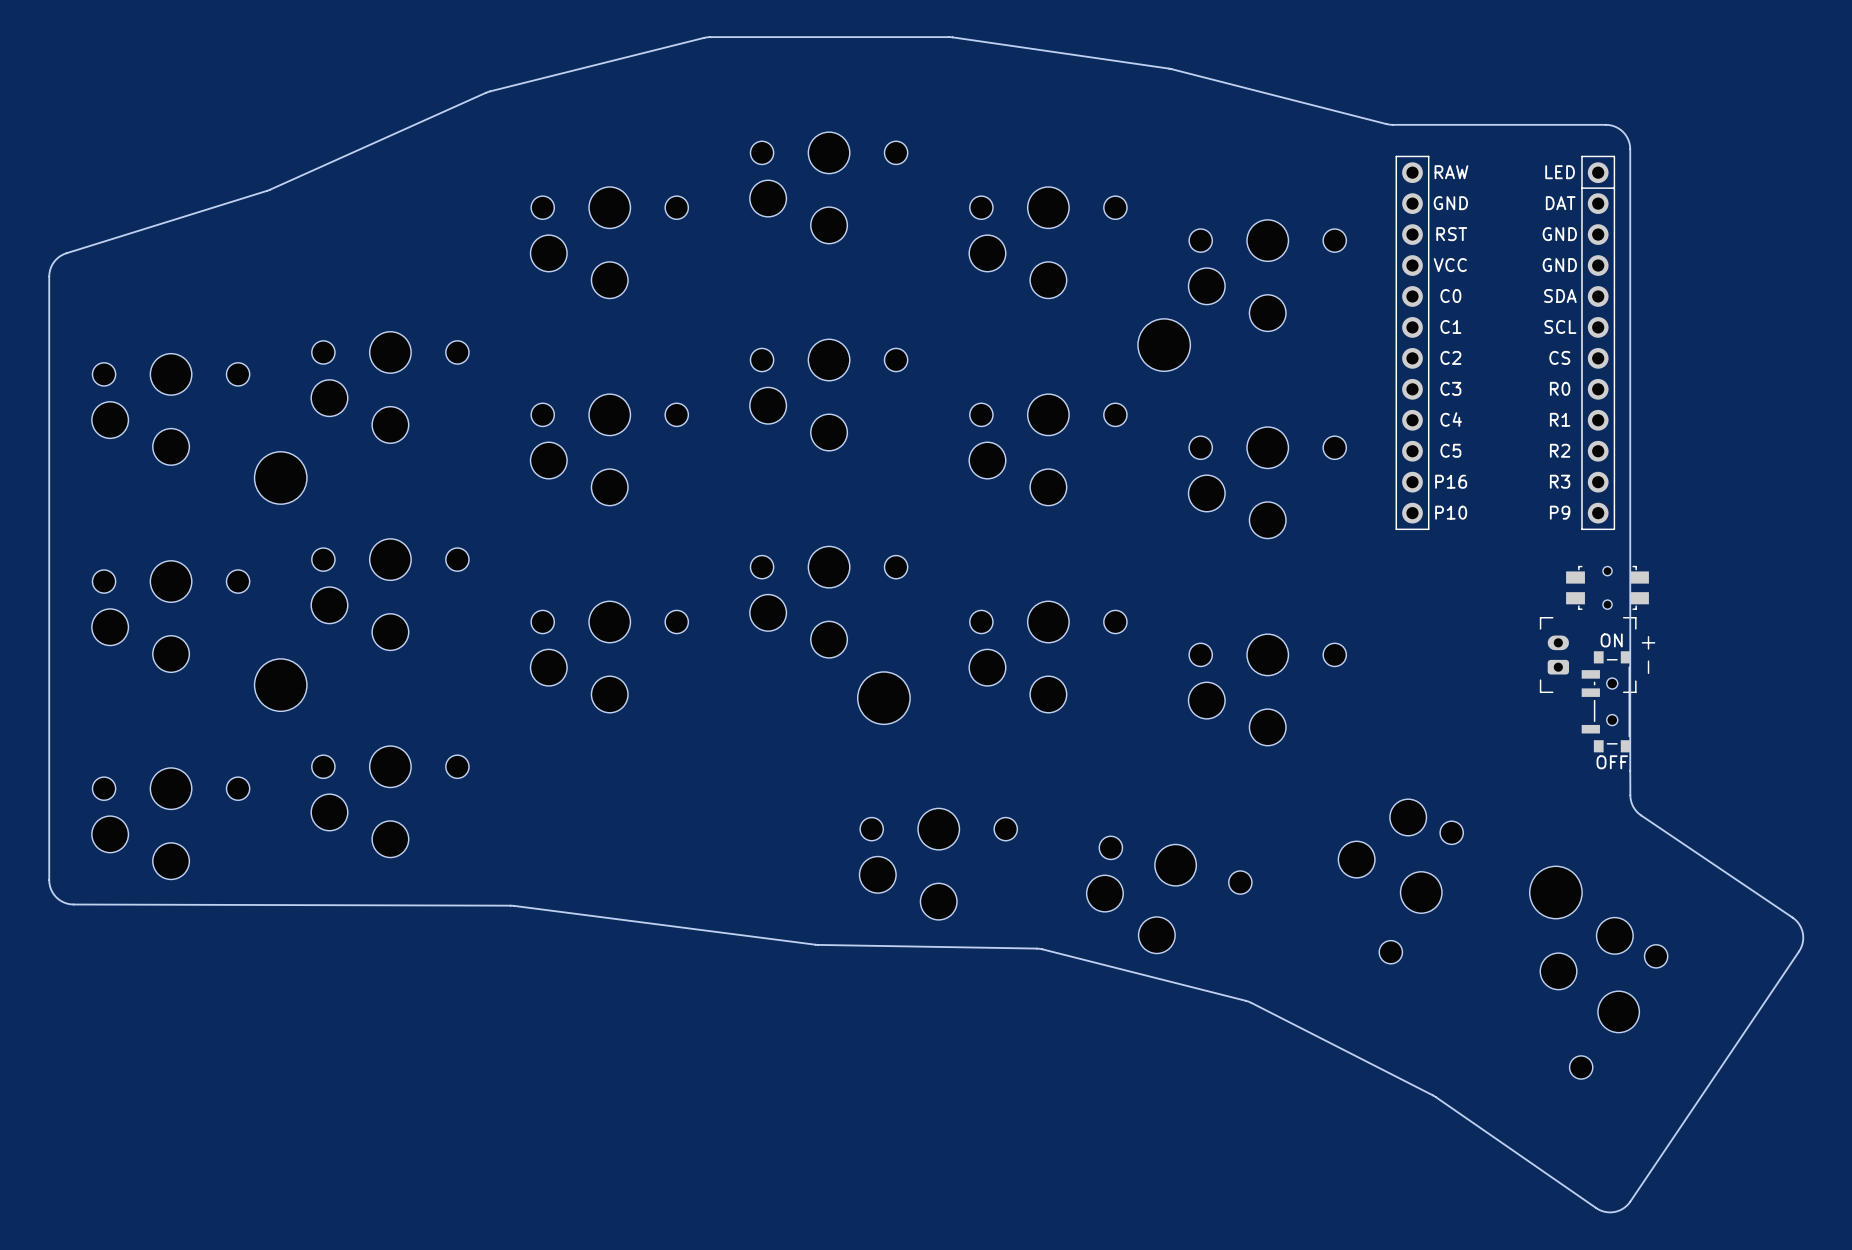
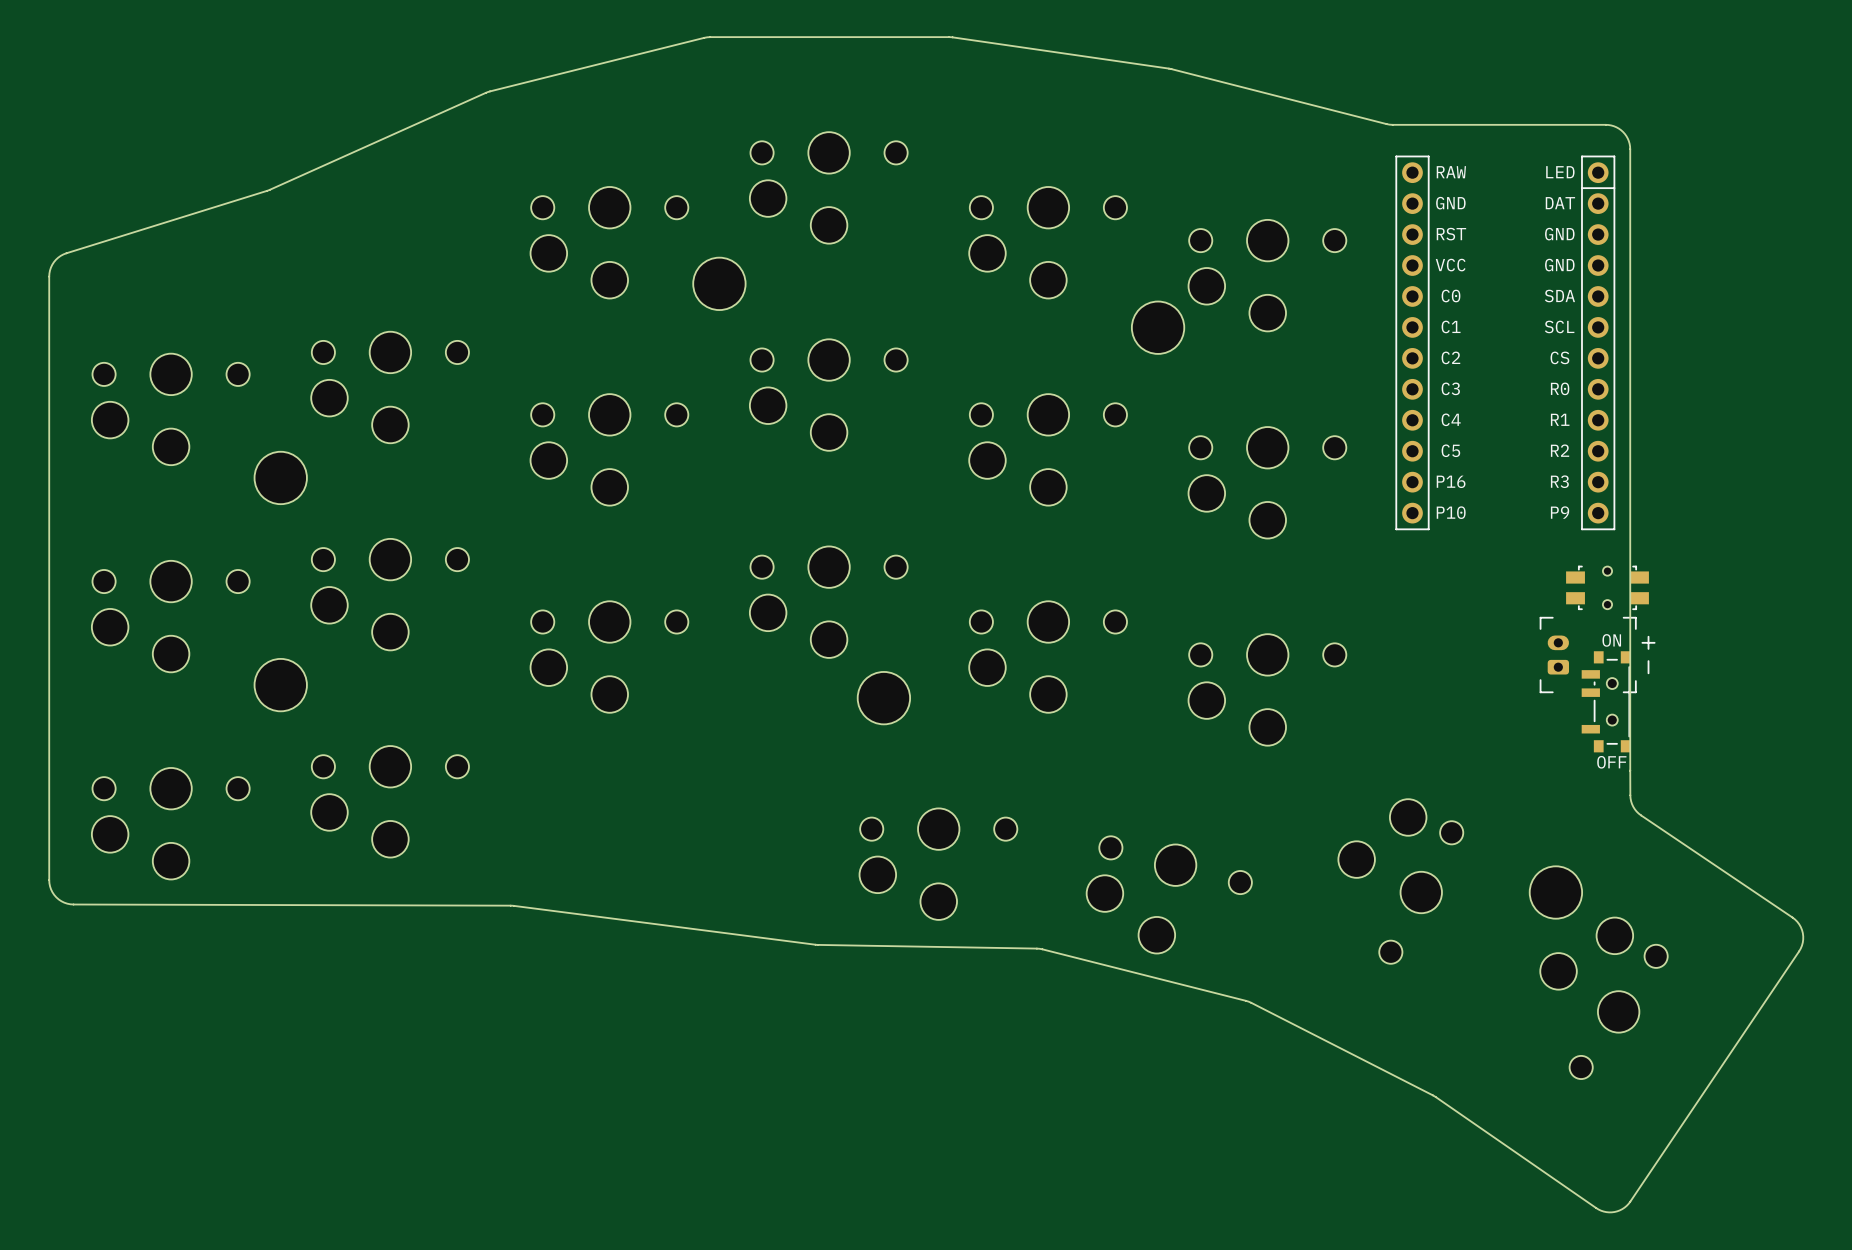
part: none -> (719, 283)
part position: (1164, 345) -> (1158, 327)

